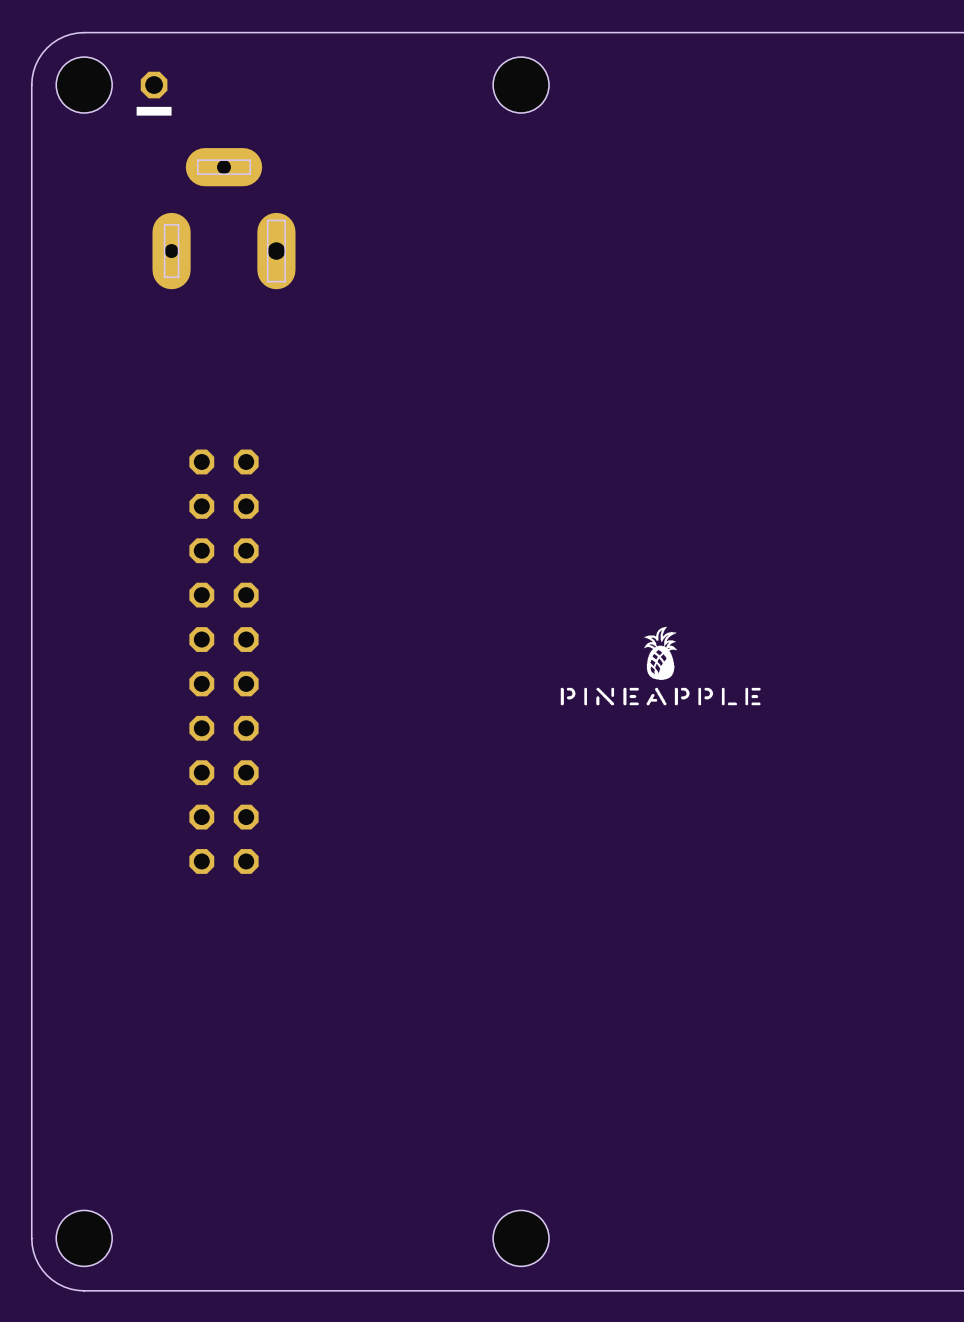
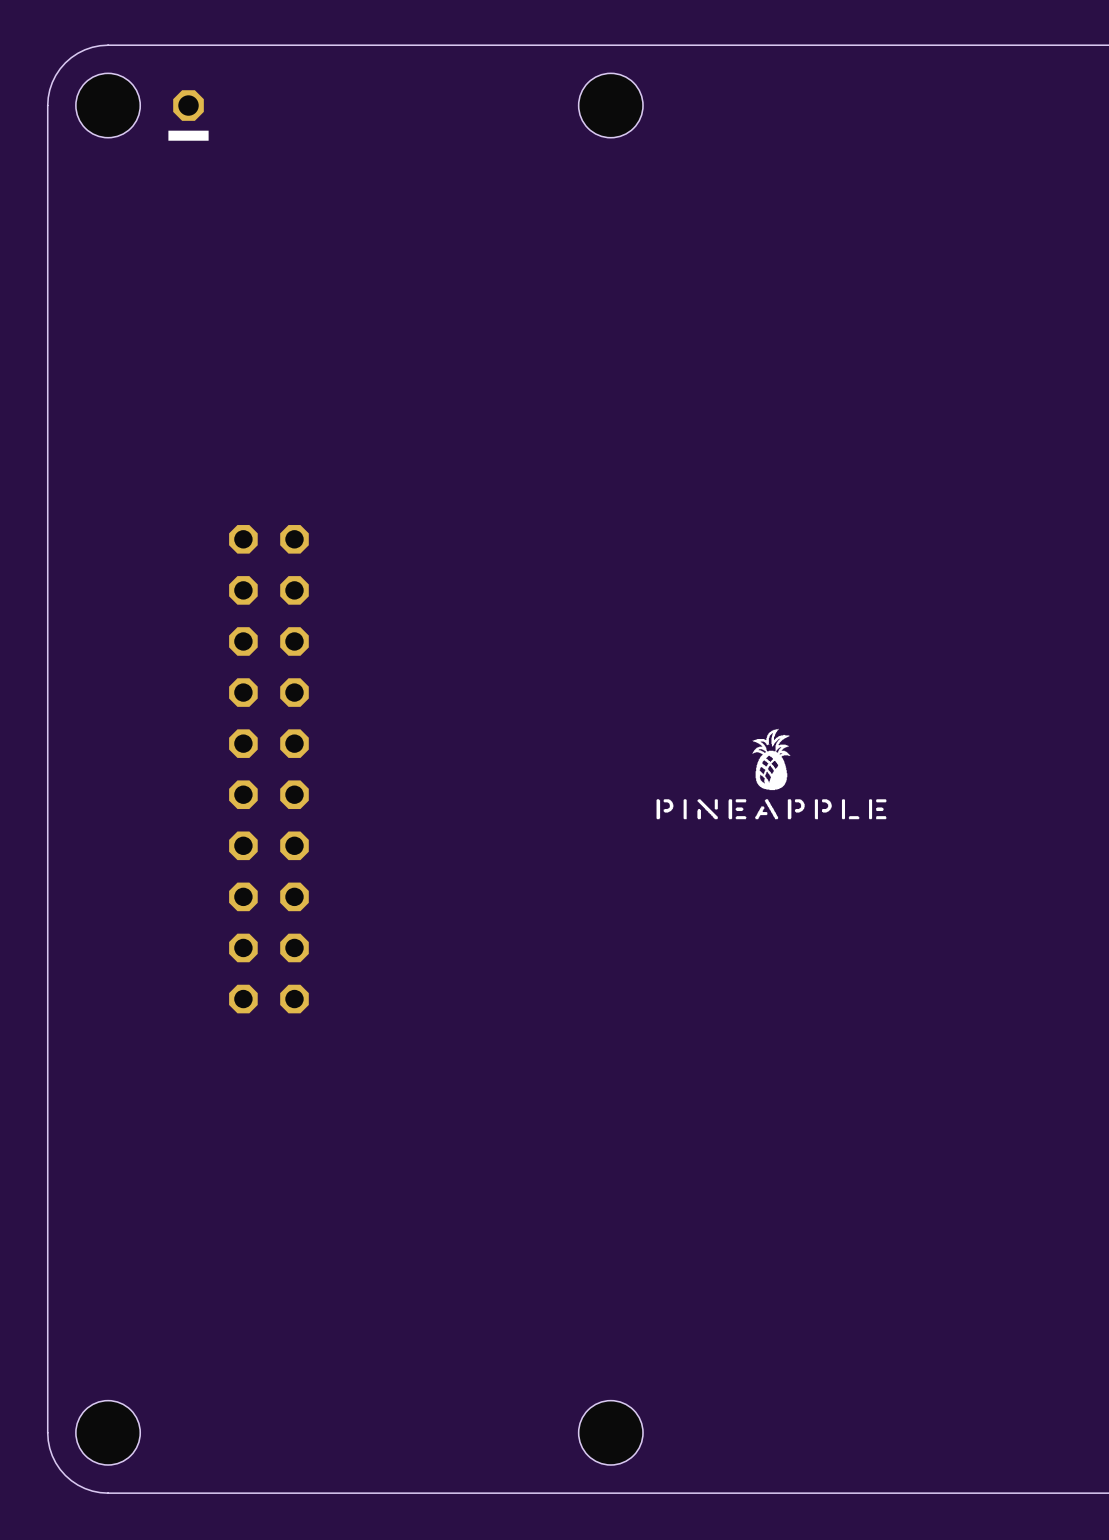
part: (224, 218) -> none

